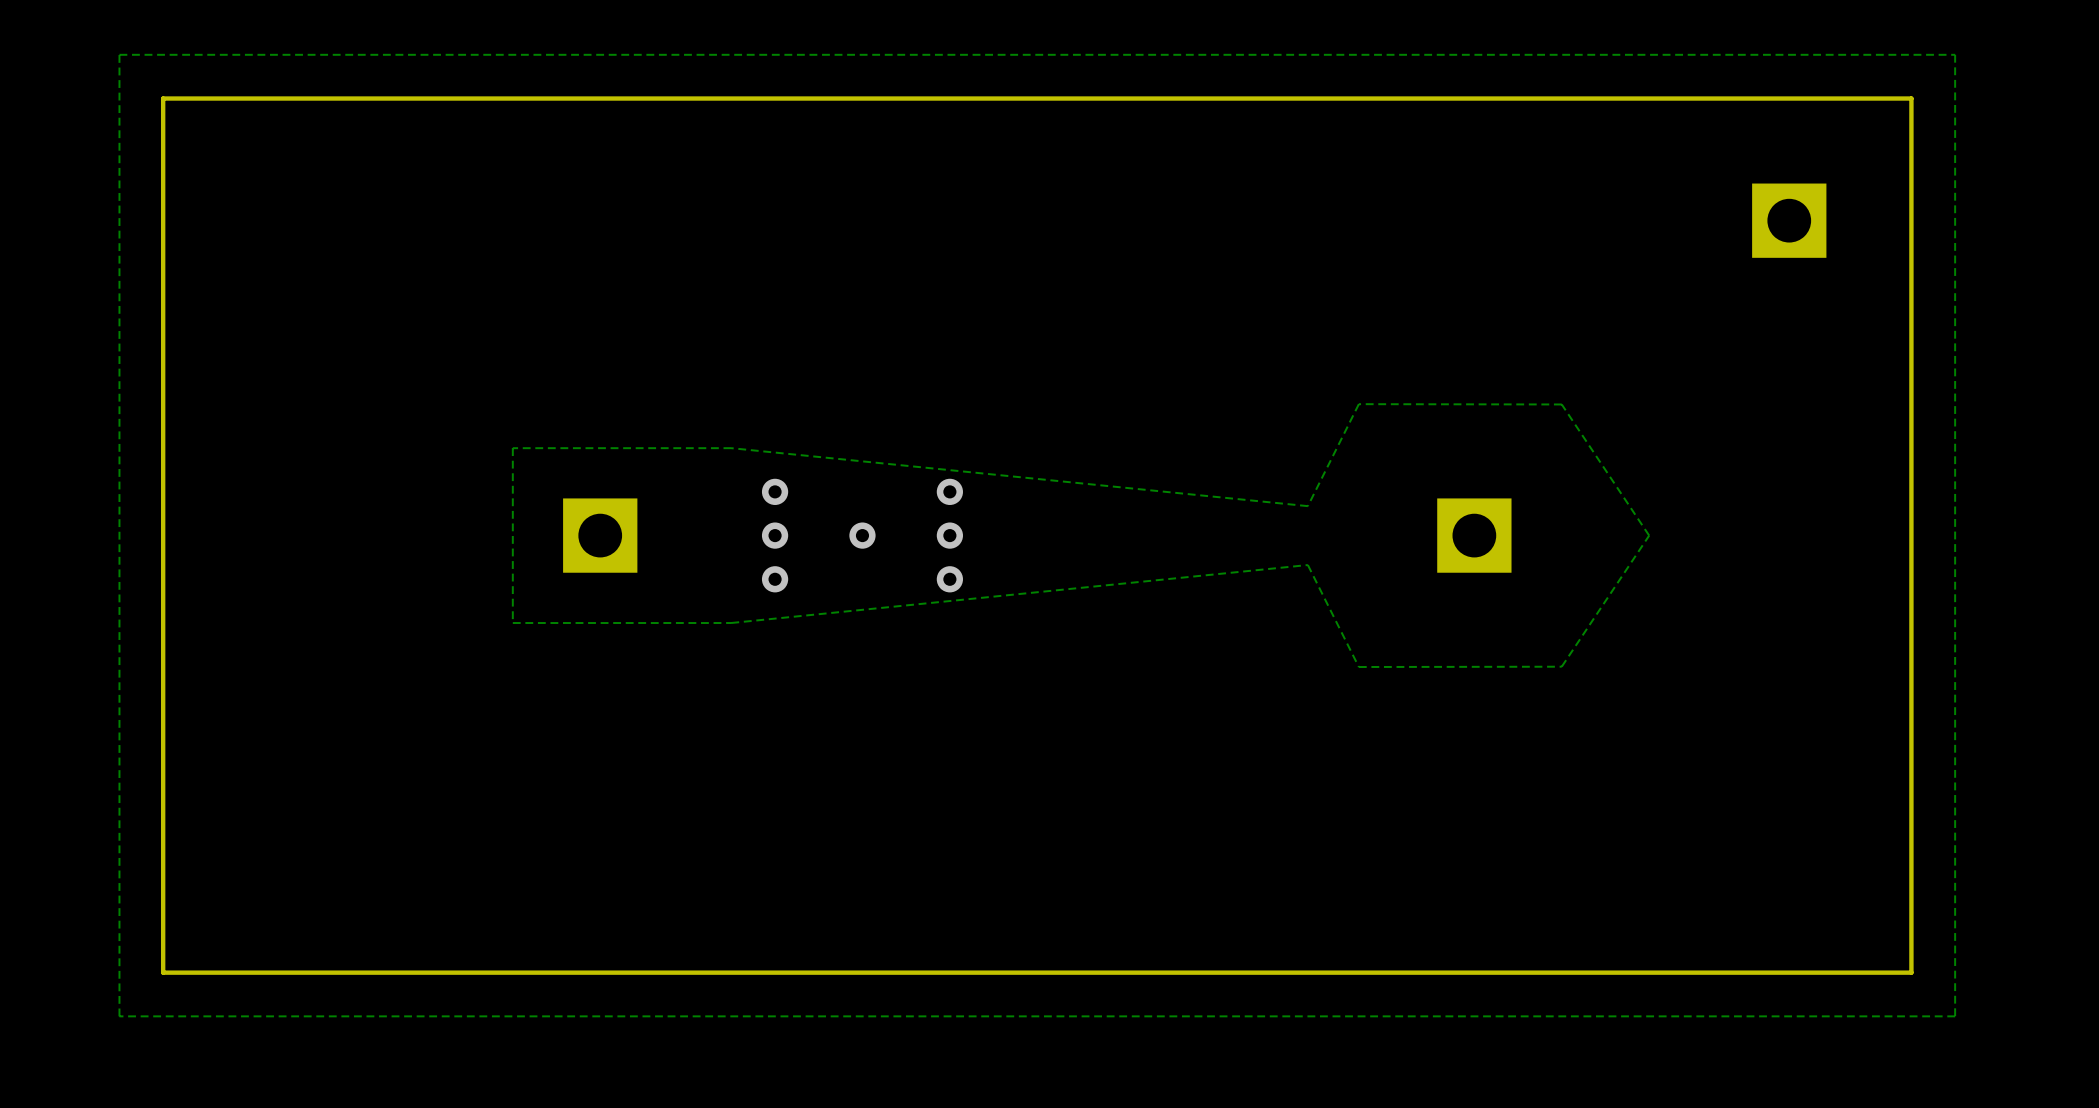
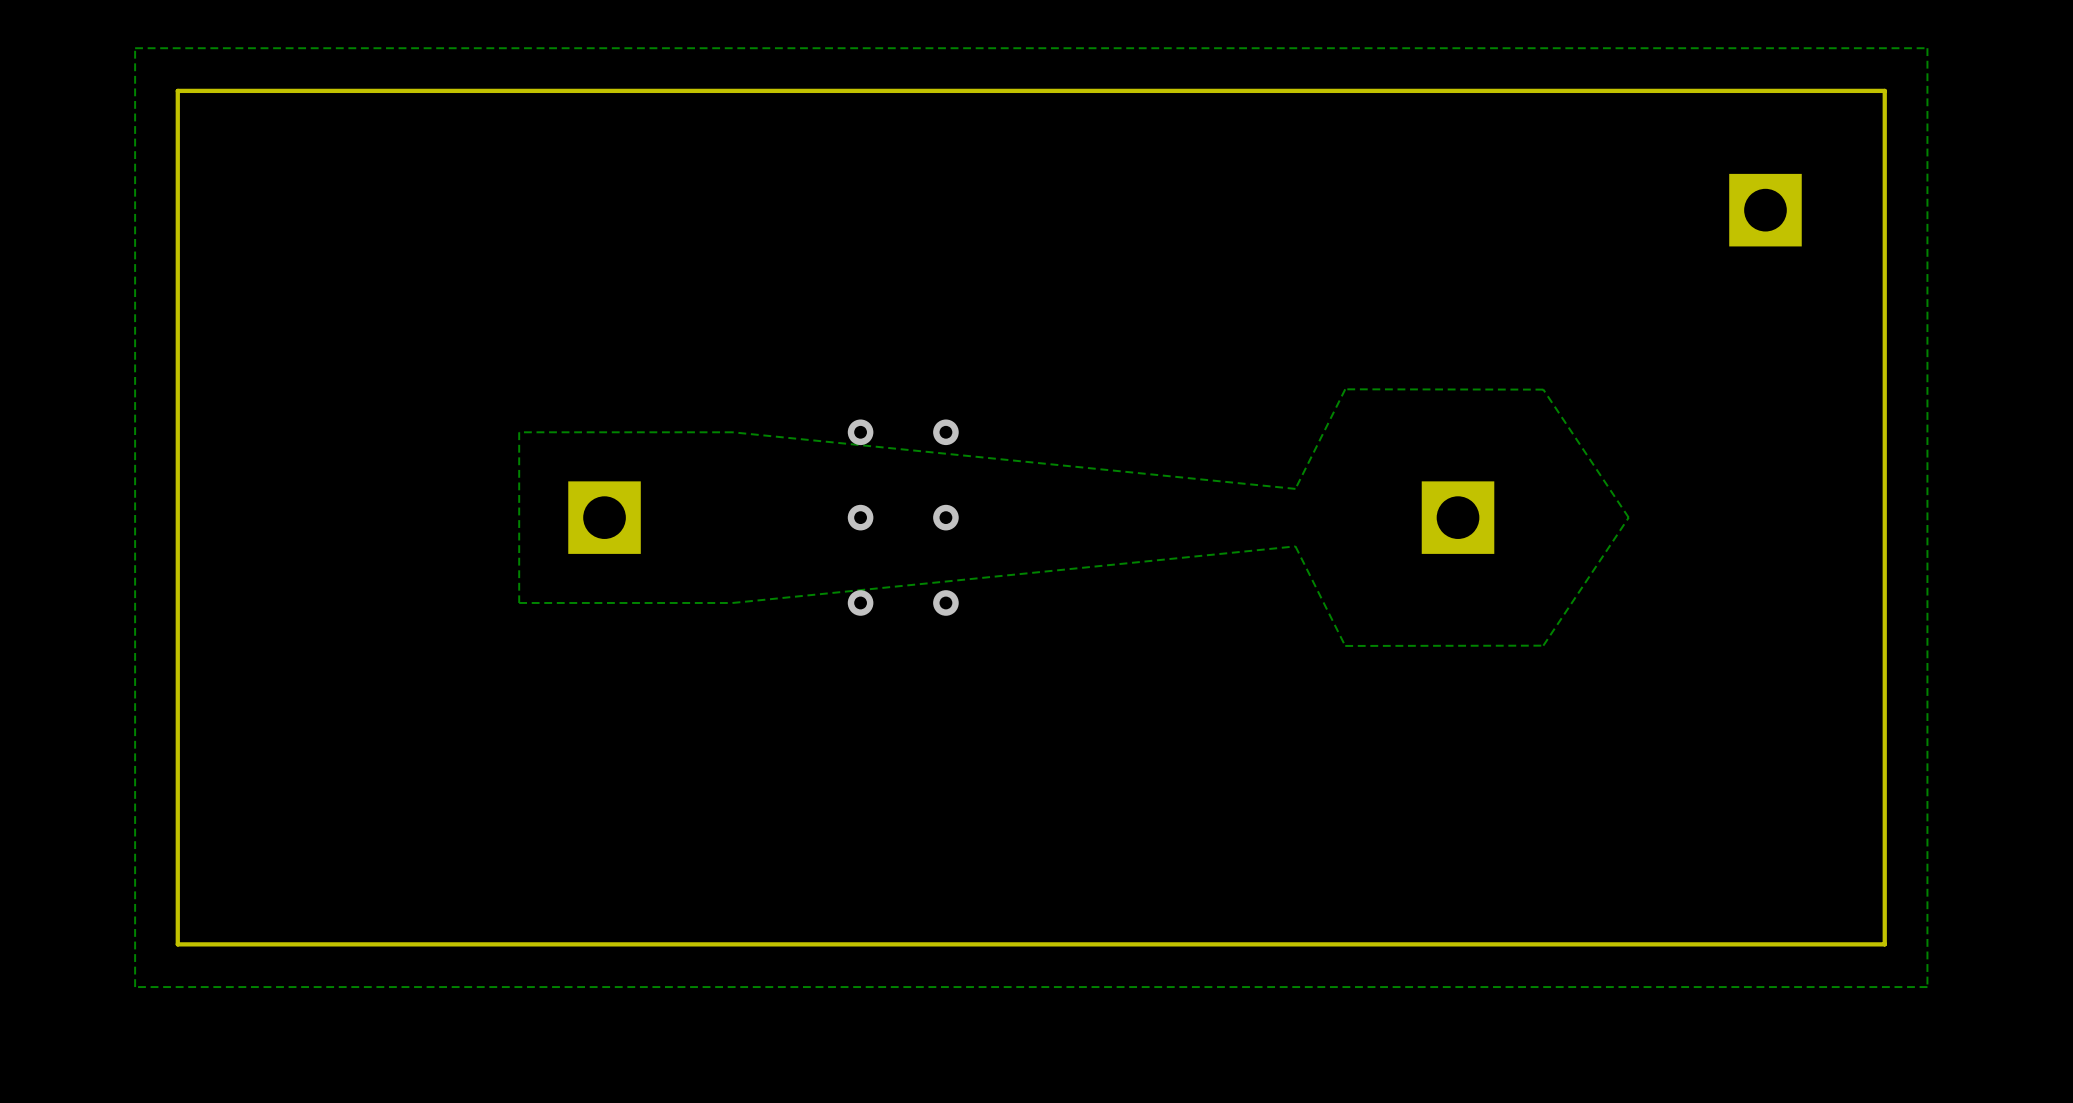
via: none -> (860, 432)
via: (775, 491) -> none
via position: (949, 491) -> (945, 432)
via: (775, 535) -> none
via: (775, 579) -> none
via position: (949, 579) -> (945, 602)
via: none -> (860, 602)

